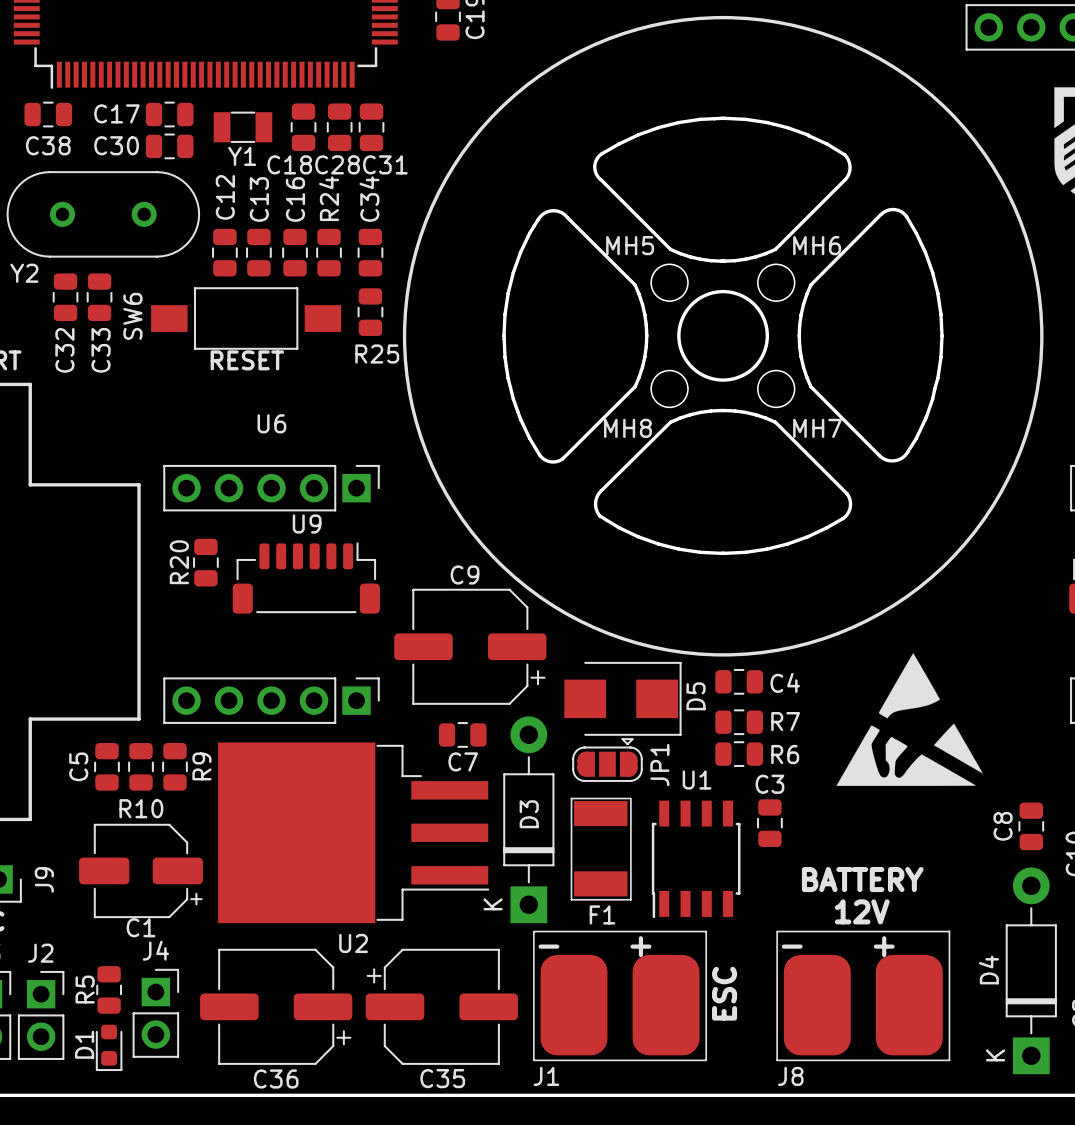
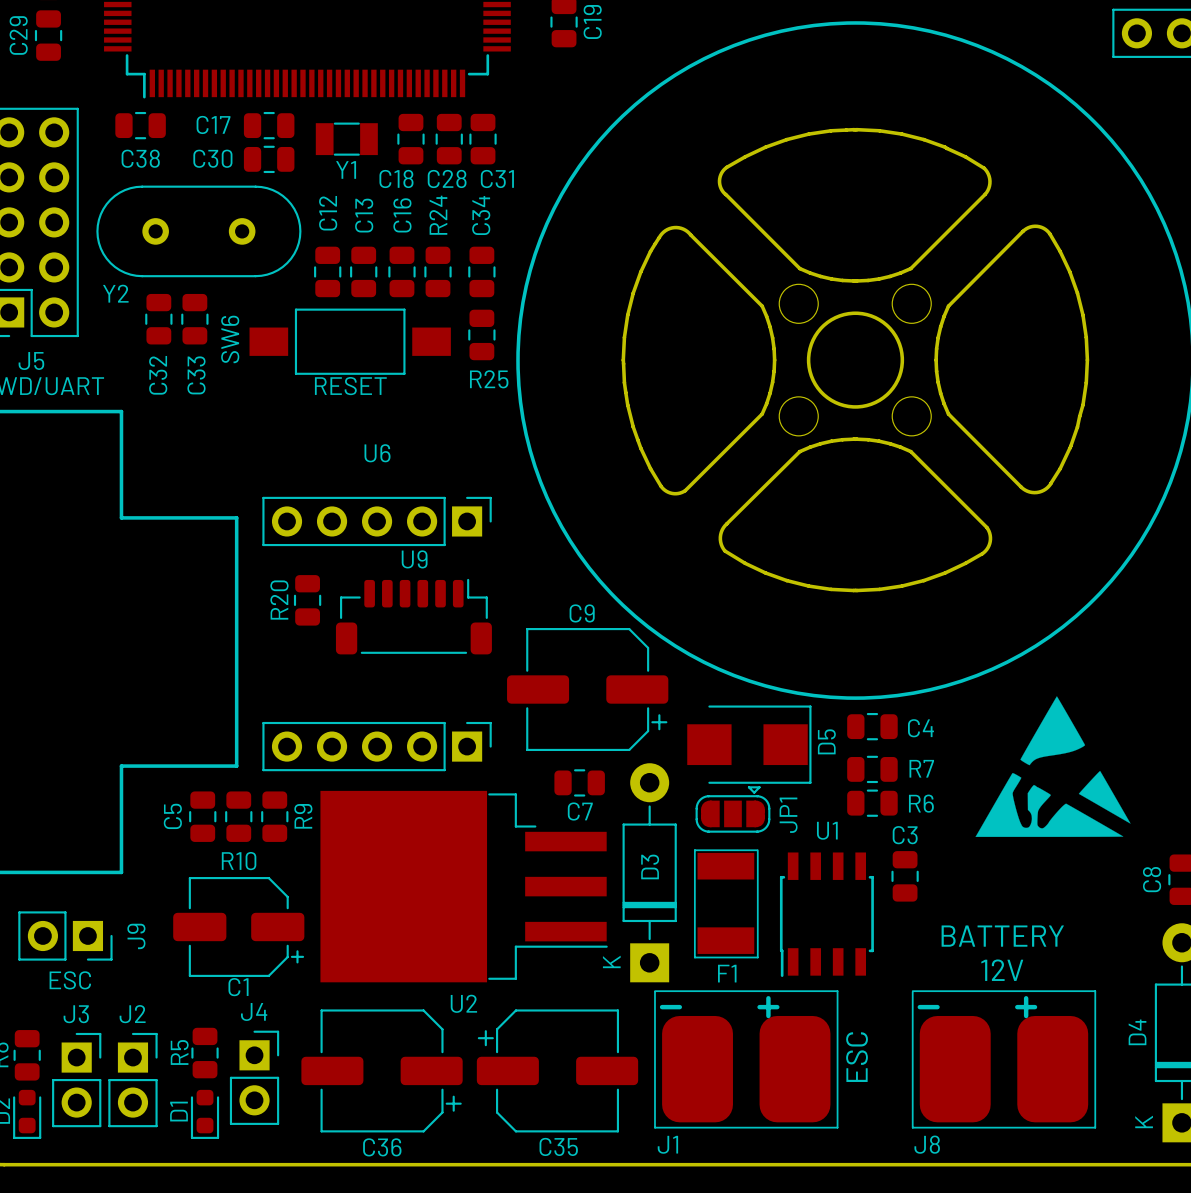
MH5 name: MH5 (630, 245) -> none
MH6 name: MH6 (817, 245) -> none
MH8 name: MH8 (627, 428) -> none
MH7 name: MH7 (817, 428) -> none

